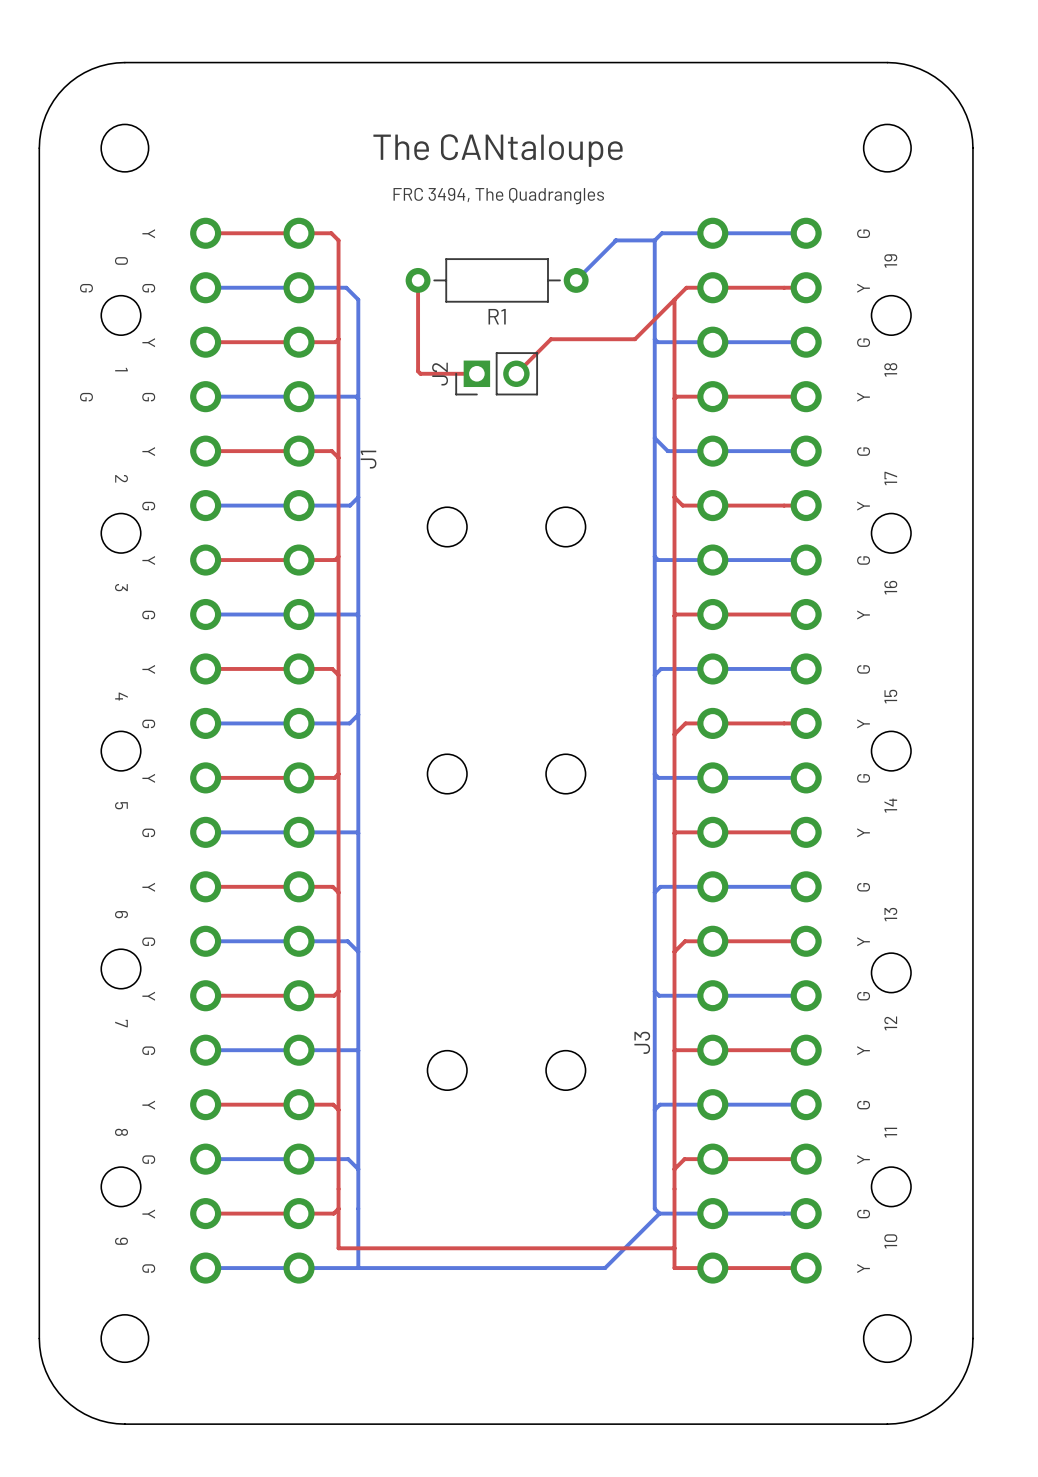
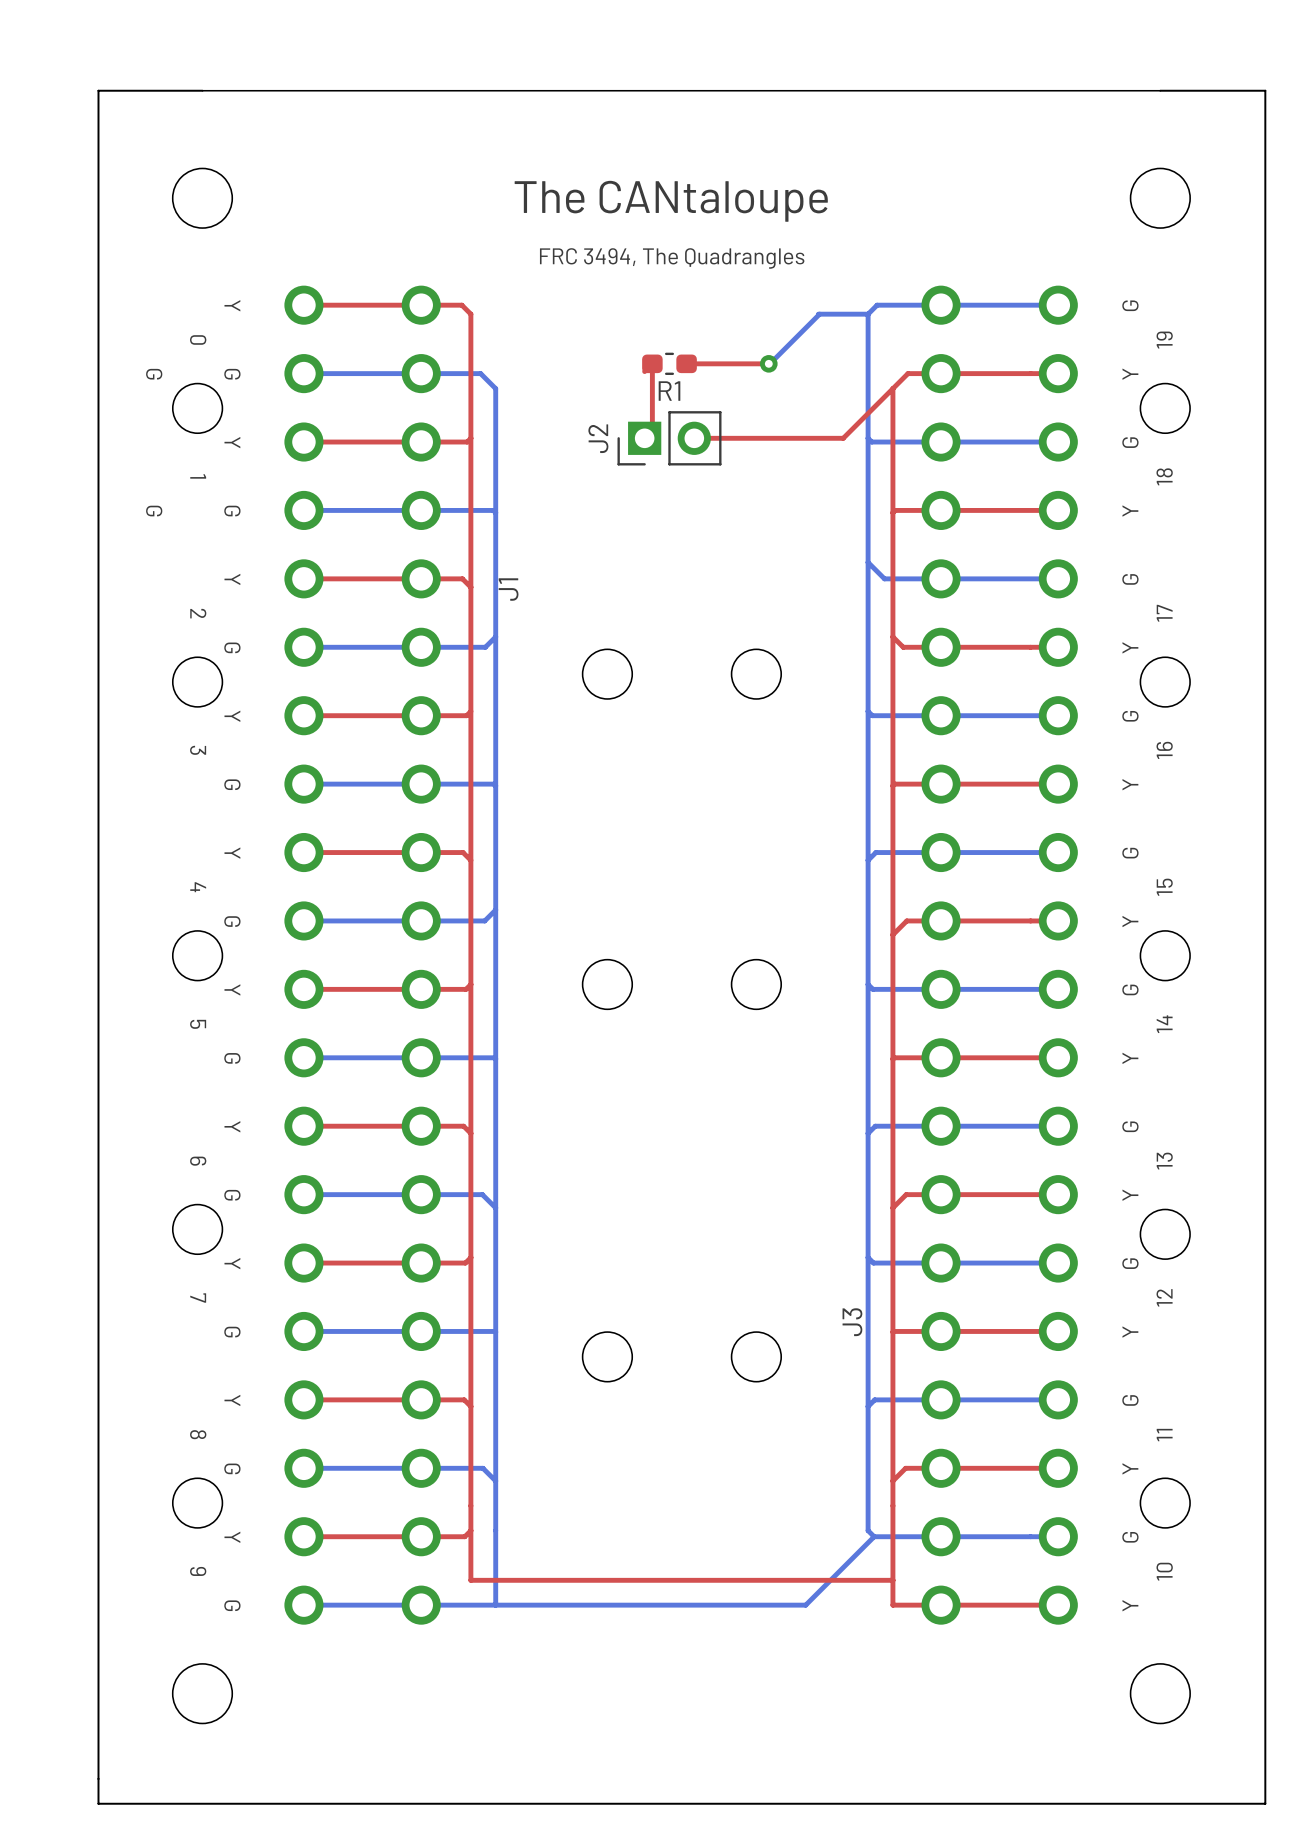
board edge: (124, 62) (108, 64) (92, 69) (77, 76) (64, 87) (53, 100) (45, 115) (40, 131) (39, 148) (39, 1346) (43, 1363) (49, 1378) (64, 1399) (77, 1409) (92, 1417) (108, 1422) (124, 1424) (895, 1423) (920, 1417) (934, 1409) (947, 1399) (962, 1378) (971, 1355) (972, 1338) (972, 139) (966, 115) (958, 100) (947, 87) (934, 76) (920, 69) (904, 64) (887, 62) -> (202, 90) (98, 90) (98, 1803) (1265, 1803) (1265, 90) (1160, 90)
R1 footprint: [405, 258, 589, 303] -> [642, 352, 697, 375]
top track: none -> (686, 363) (768, 363)
via: none -> (768, 363)
top track: (418, 280) (418, 371) (420, 373) (476, 373) -> none
top track: none -> (644, 371) (652, 363) (652, 430) (644, 438)
top track: (550, 339) (516, 373) -> (737, 438) (694, 438)
J2 position: (496, 373) -> (669, 438)

